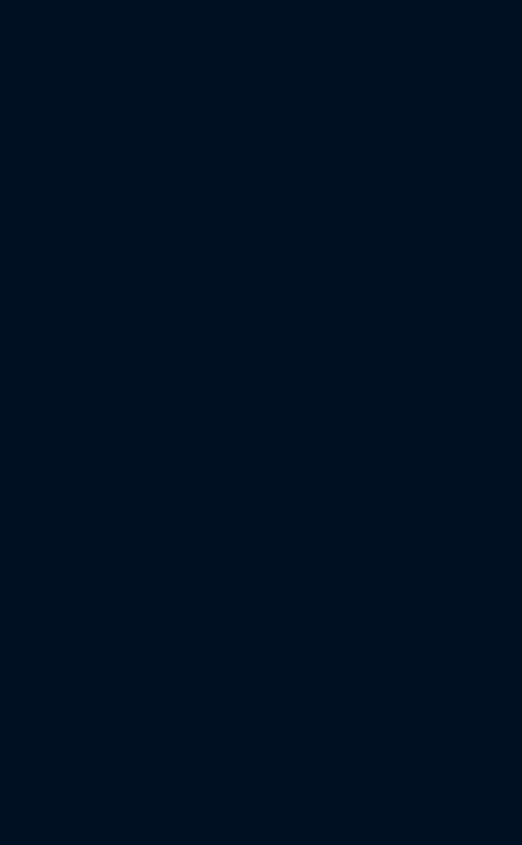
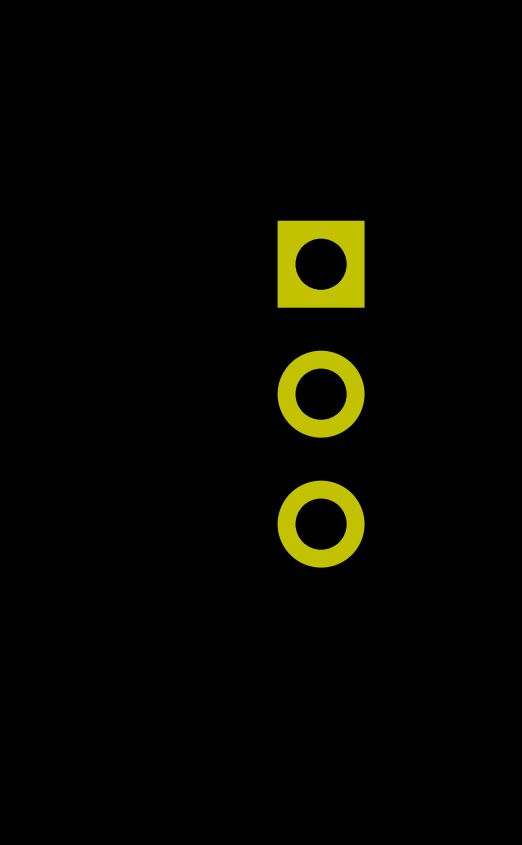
part: none -> (321, 394)

